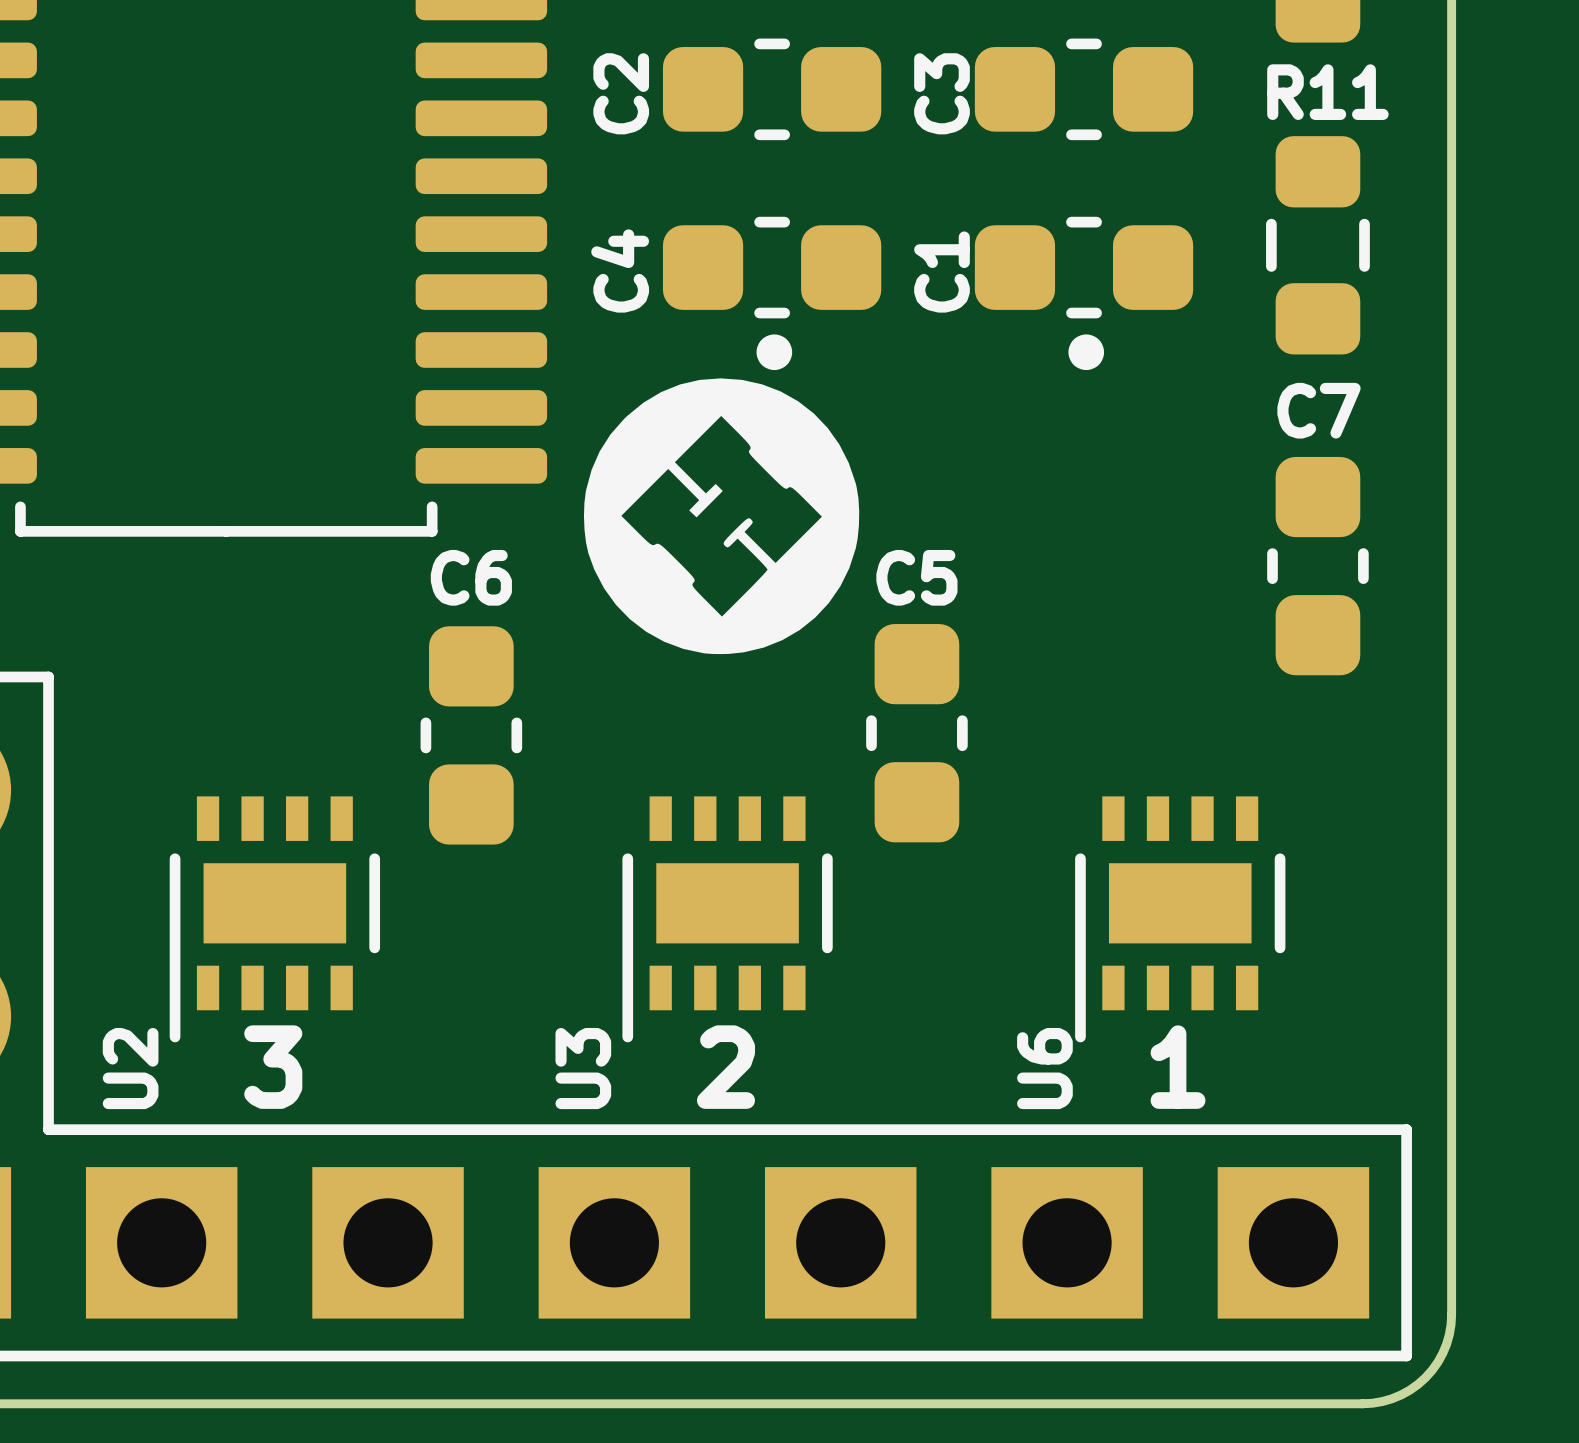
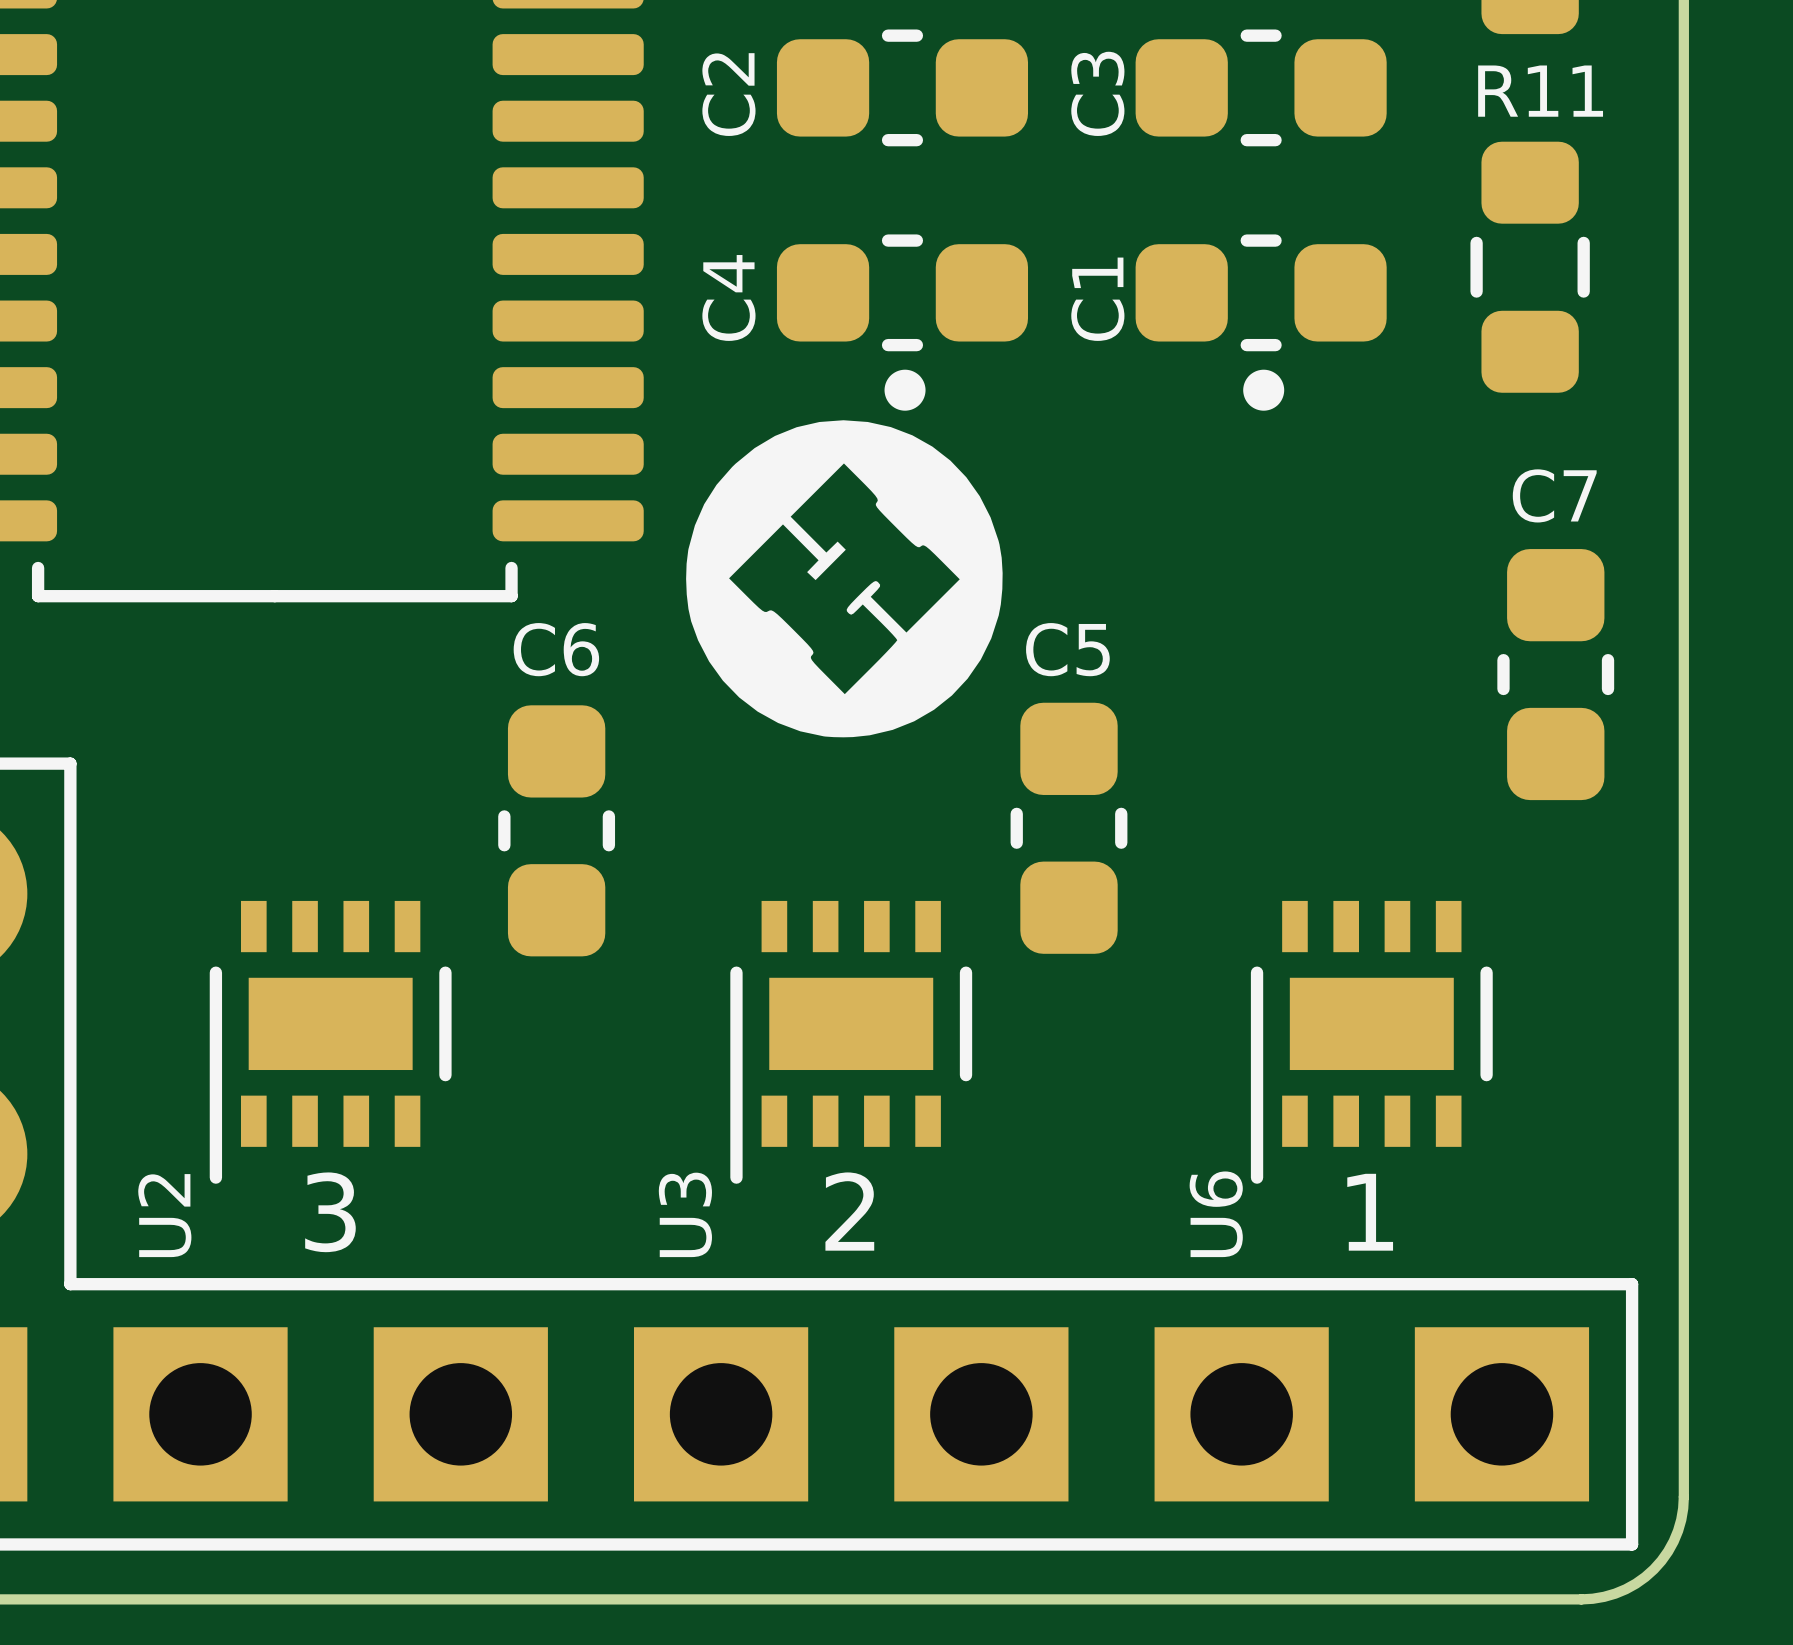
C7 position: (1317, 566) -> (1555, 674)

